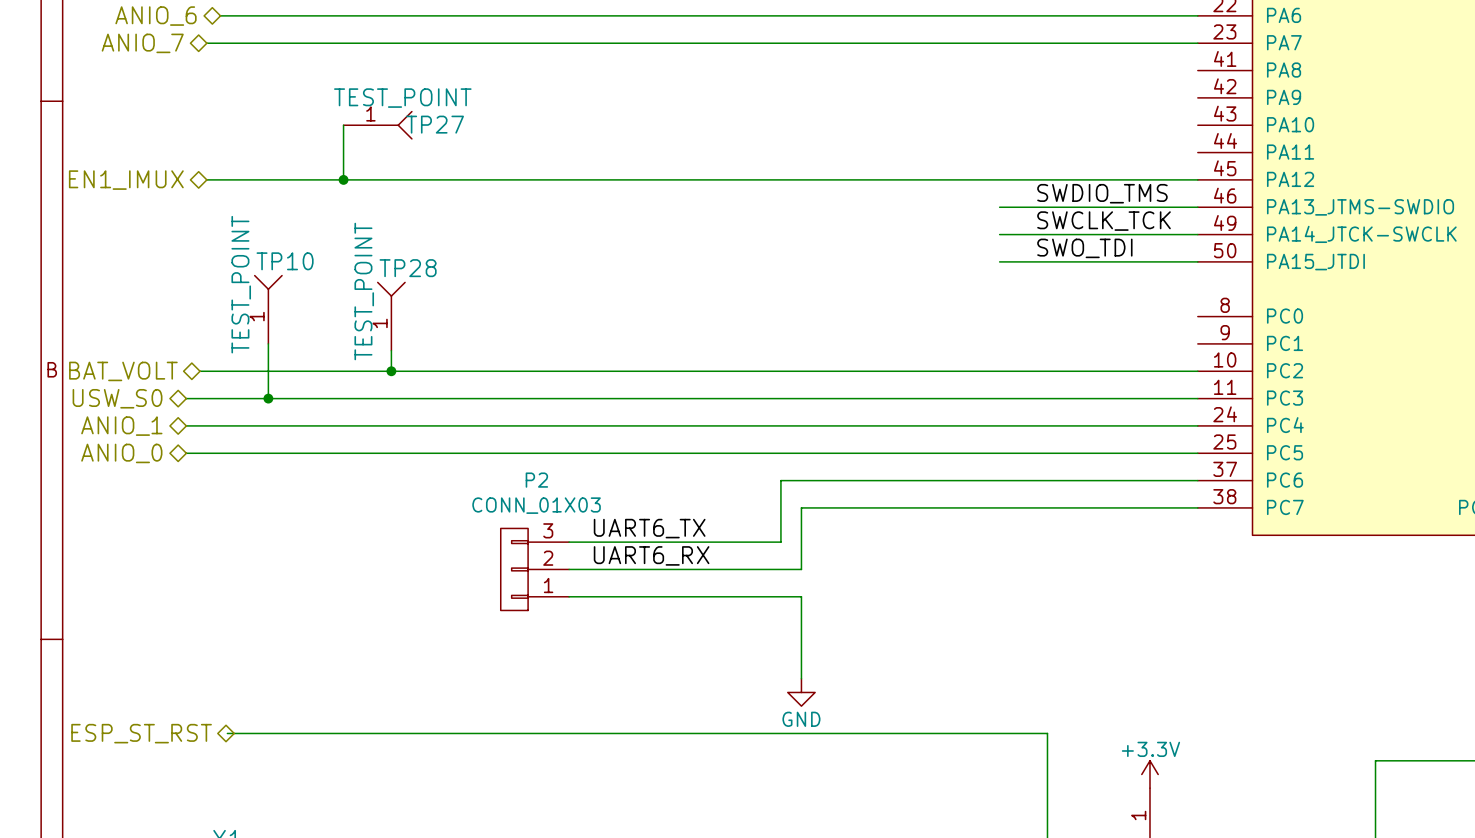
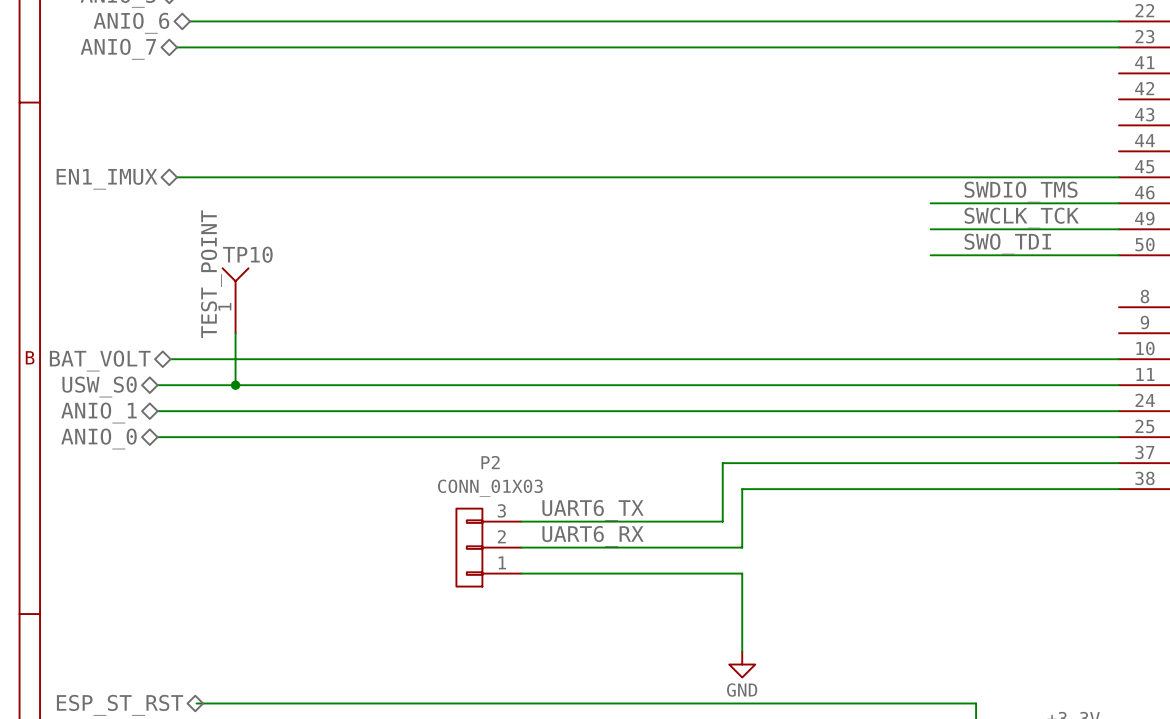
wire: (343, 125) (343, 179) -> none
TP27: TEST_POINT (377, 125) -> none
junction: (343, 179) -> none
TP28: TEST_POINT (391, 316) -> none
wire: (391, 350) (391, 371) -> none
junction: (391, 371) -> none

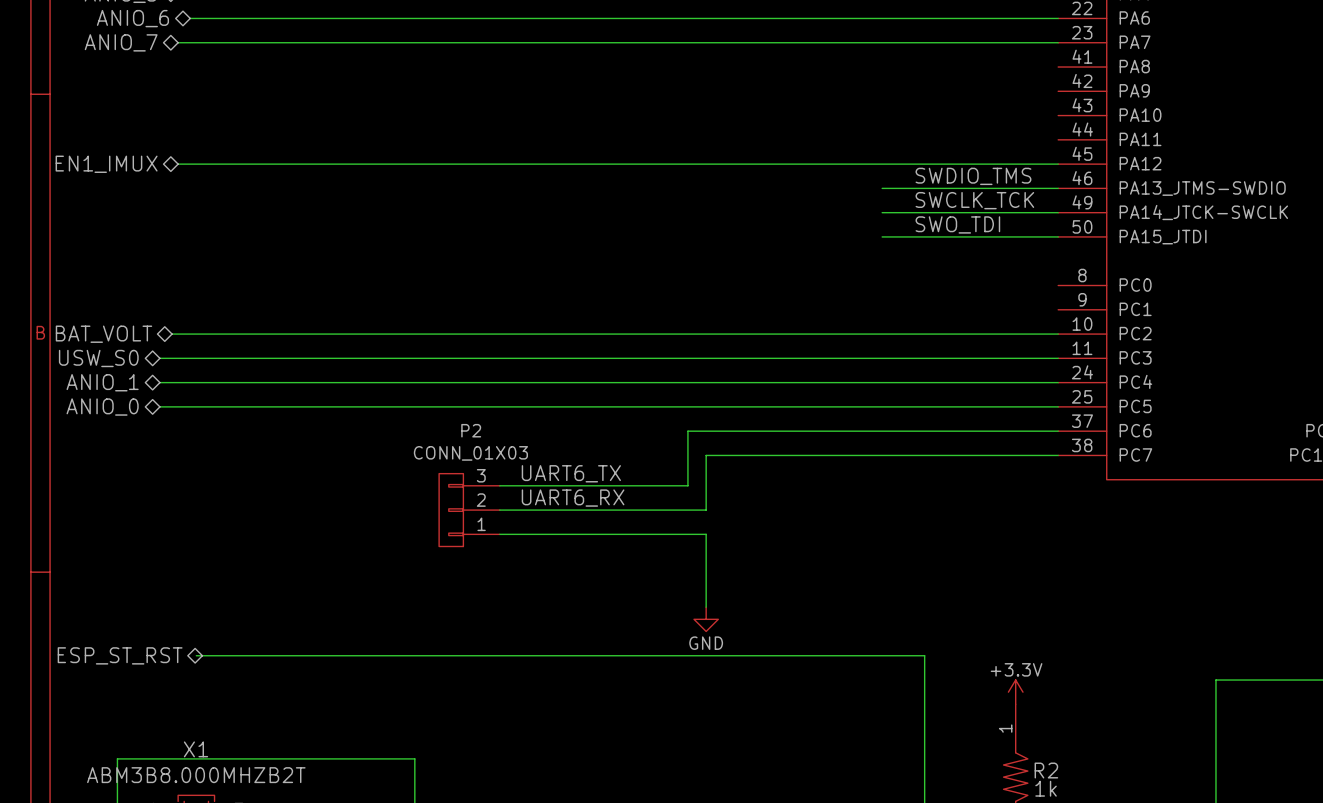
TP10: TEST_POINT (235, 300) -> none
wire: (235, 333) (235, 385) -> none
junction: (235, 385) -> none

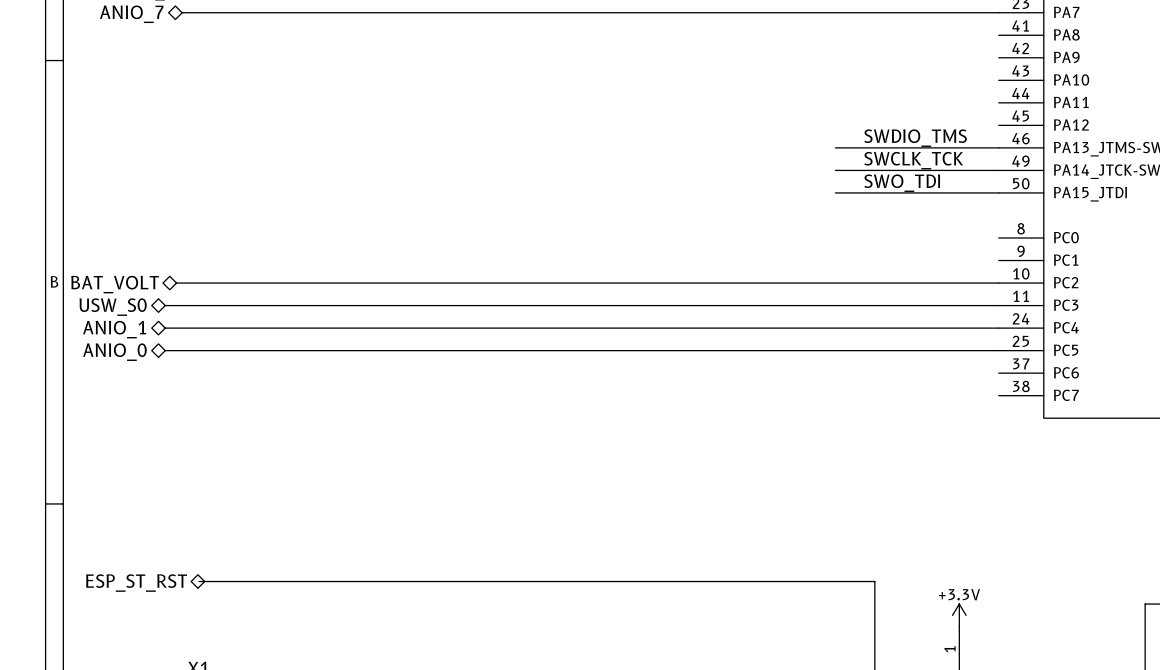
hierarchical label: EN1_IMUX (106, 164) -> none
wire: (178, 164) (1058, 164) -> none
wire: (1058, 431) (687, 431) (687, 485) (499, 485) -> none
wire: (1058, 455) (706, 455) (706, 510) (499, 510) -> none
label: UART6_TX (571, 473) -> none
label: UART6_RX (573, 498) -> none
P2: CONN_01X03 (469, 510) -> none
wire: (499, 534) (706, 534) (706, 607) -> none
power symbol: GND (706, 619) -> none

